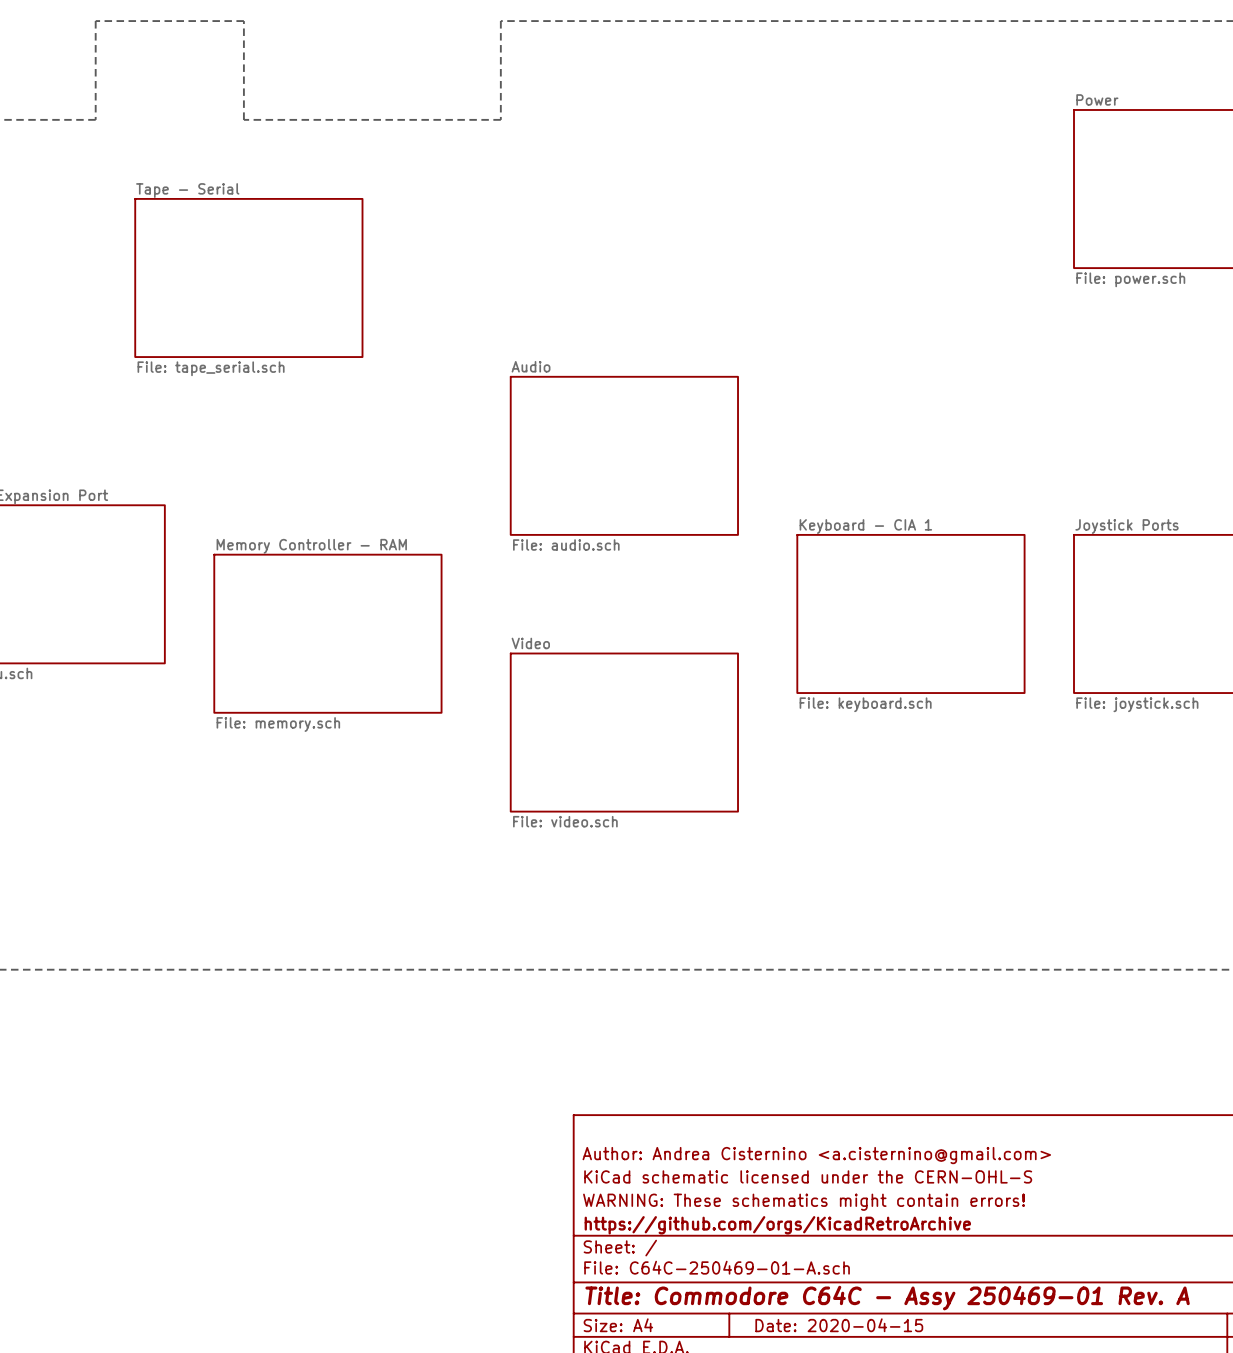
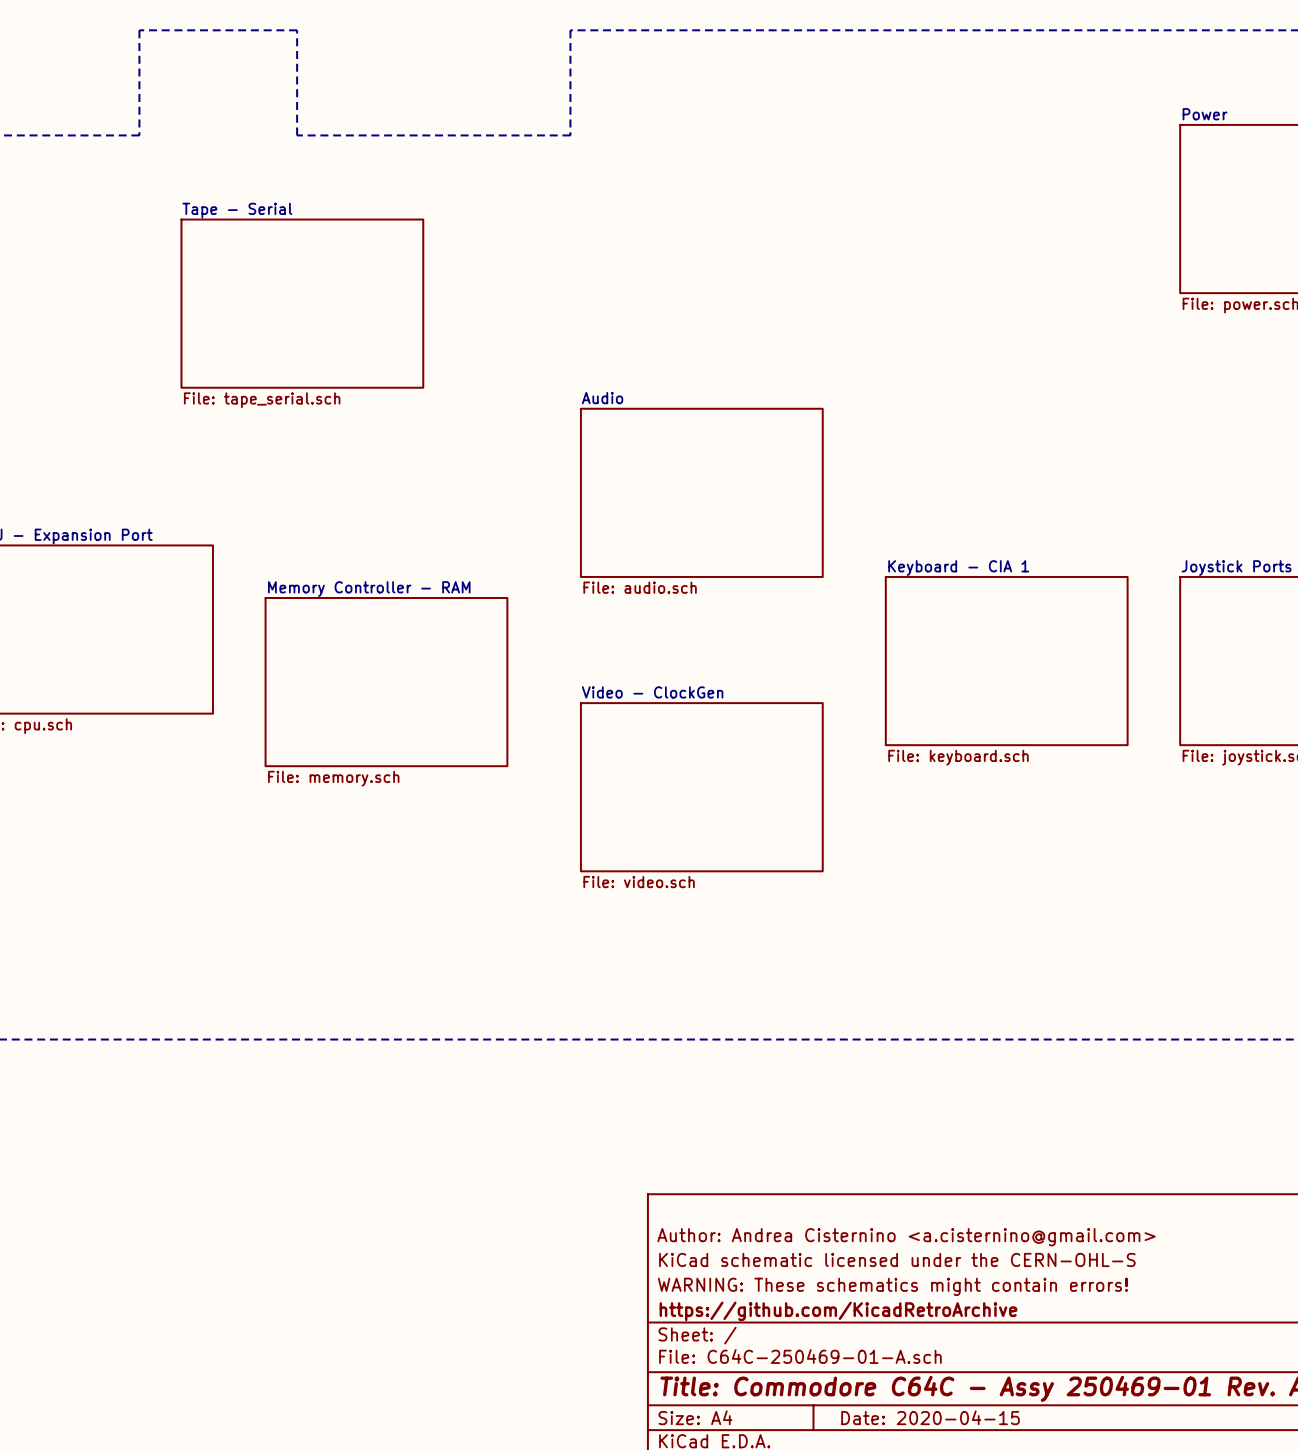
sheet Video name: Video (530, 643) -> Video - ClockGen (652, 692)
title block: https://github.com/orgs/KicadRetroArchive (777, 1225) -> https://github.com/KicadRetroArchive (838, 1311)

